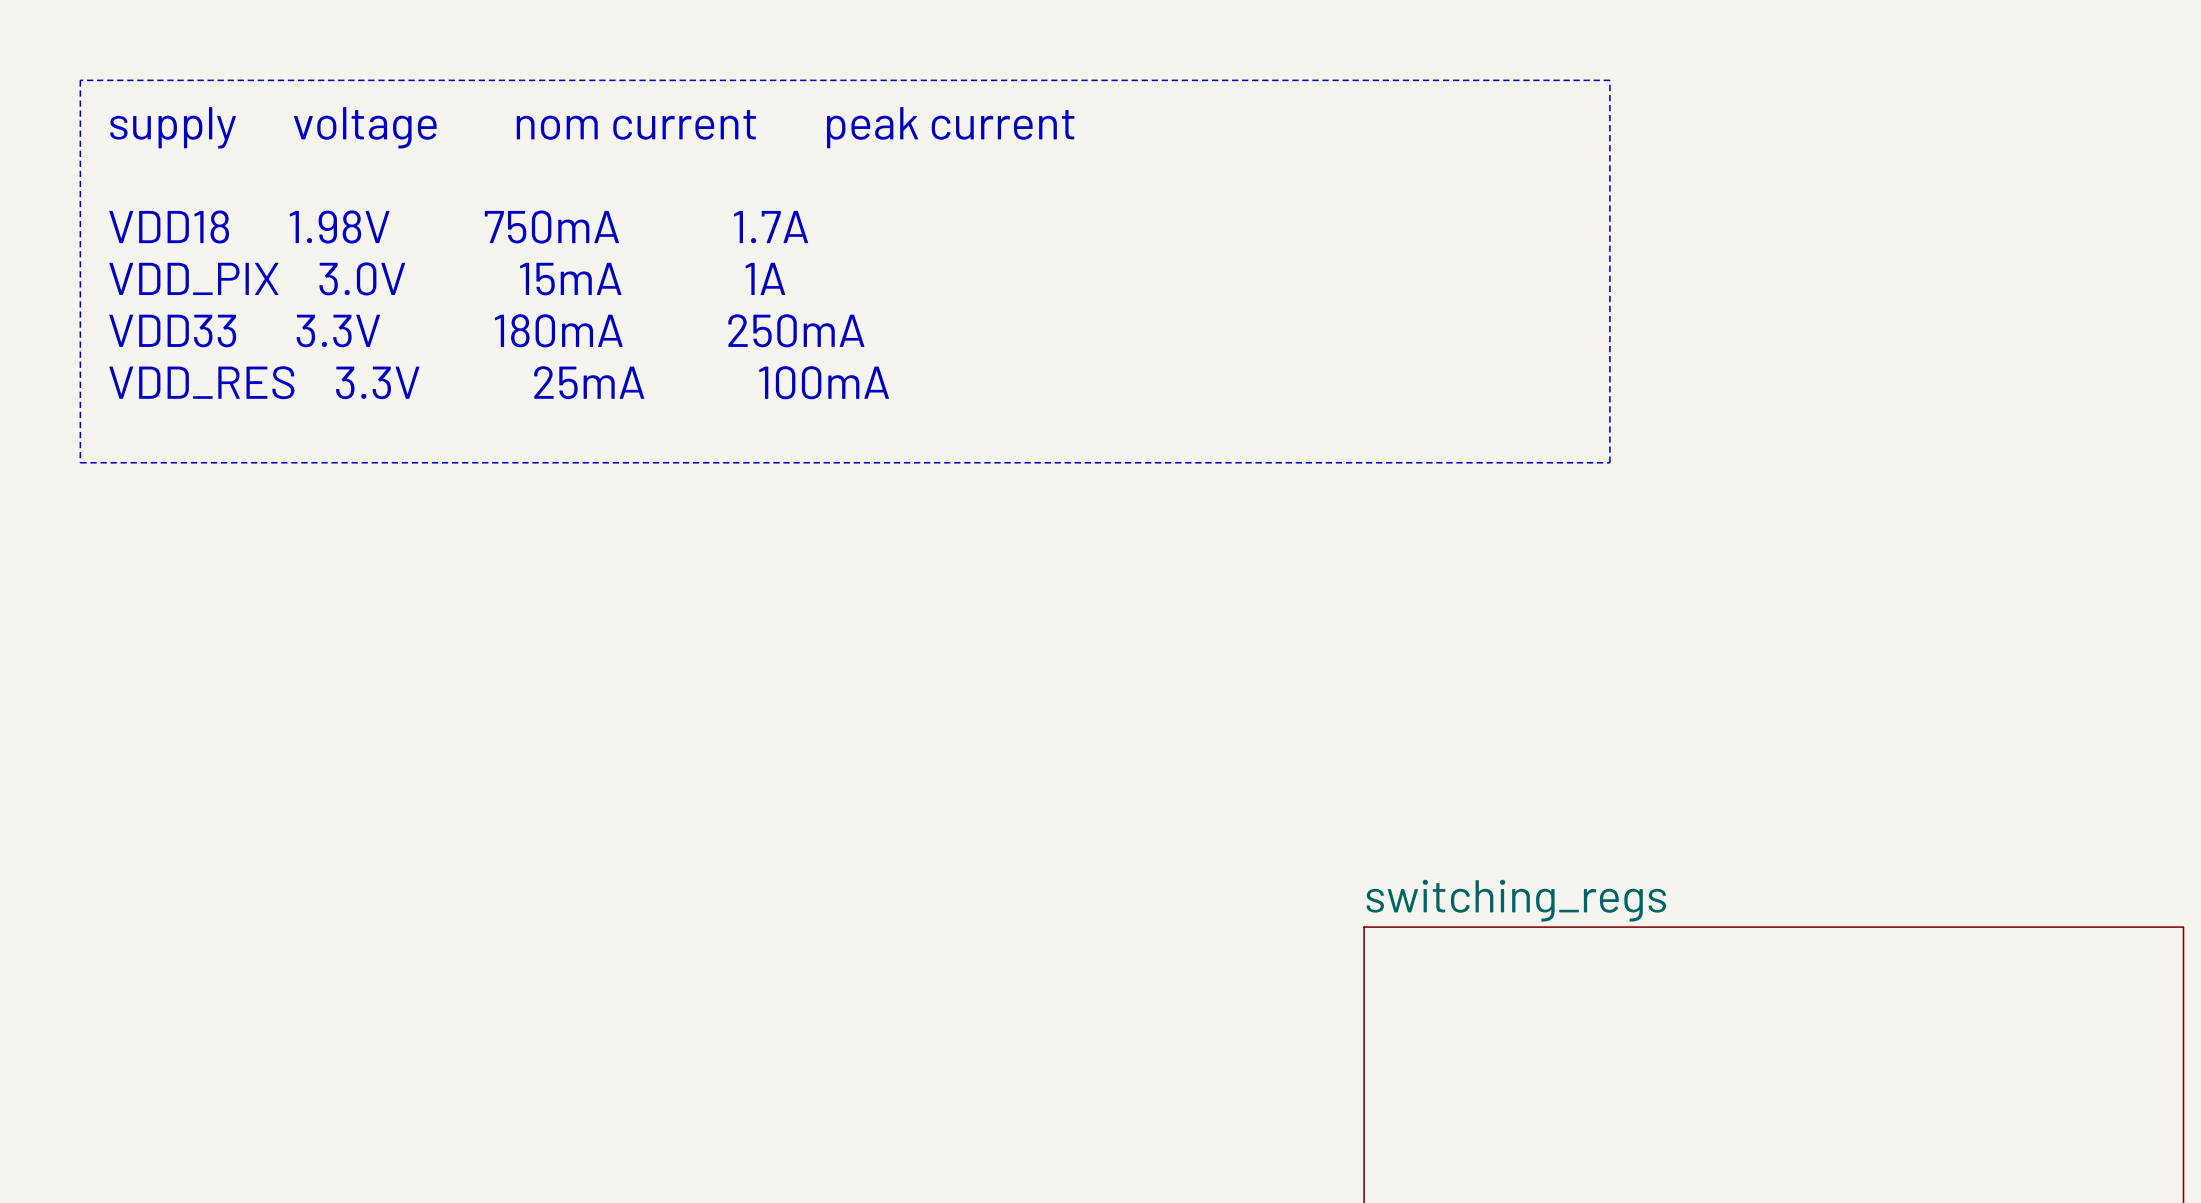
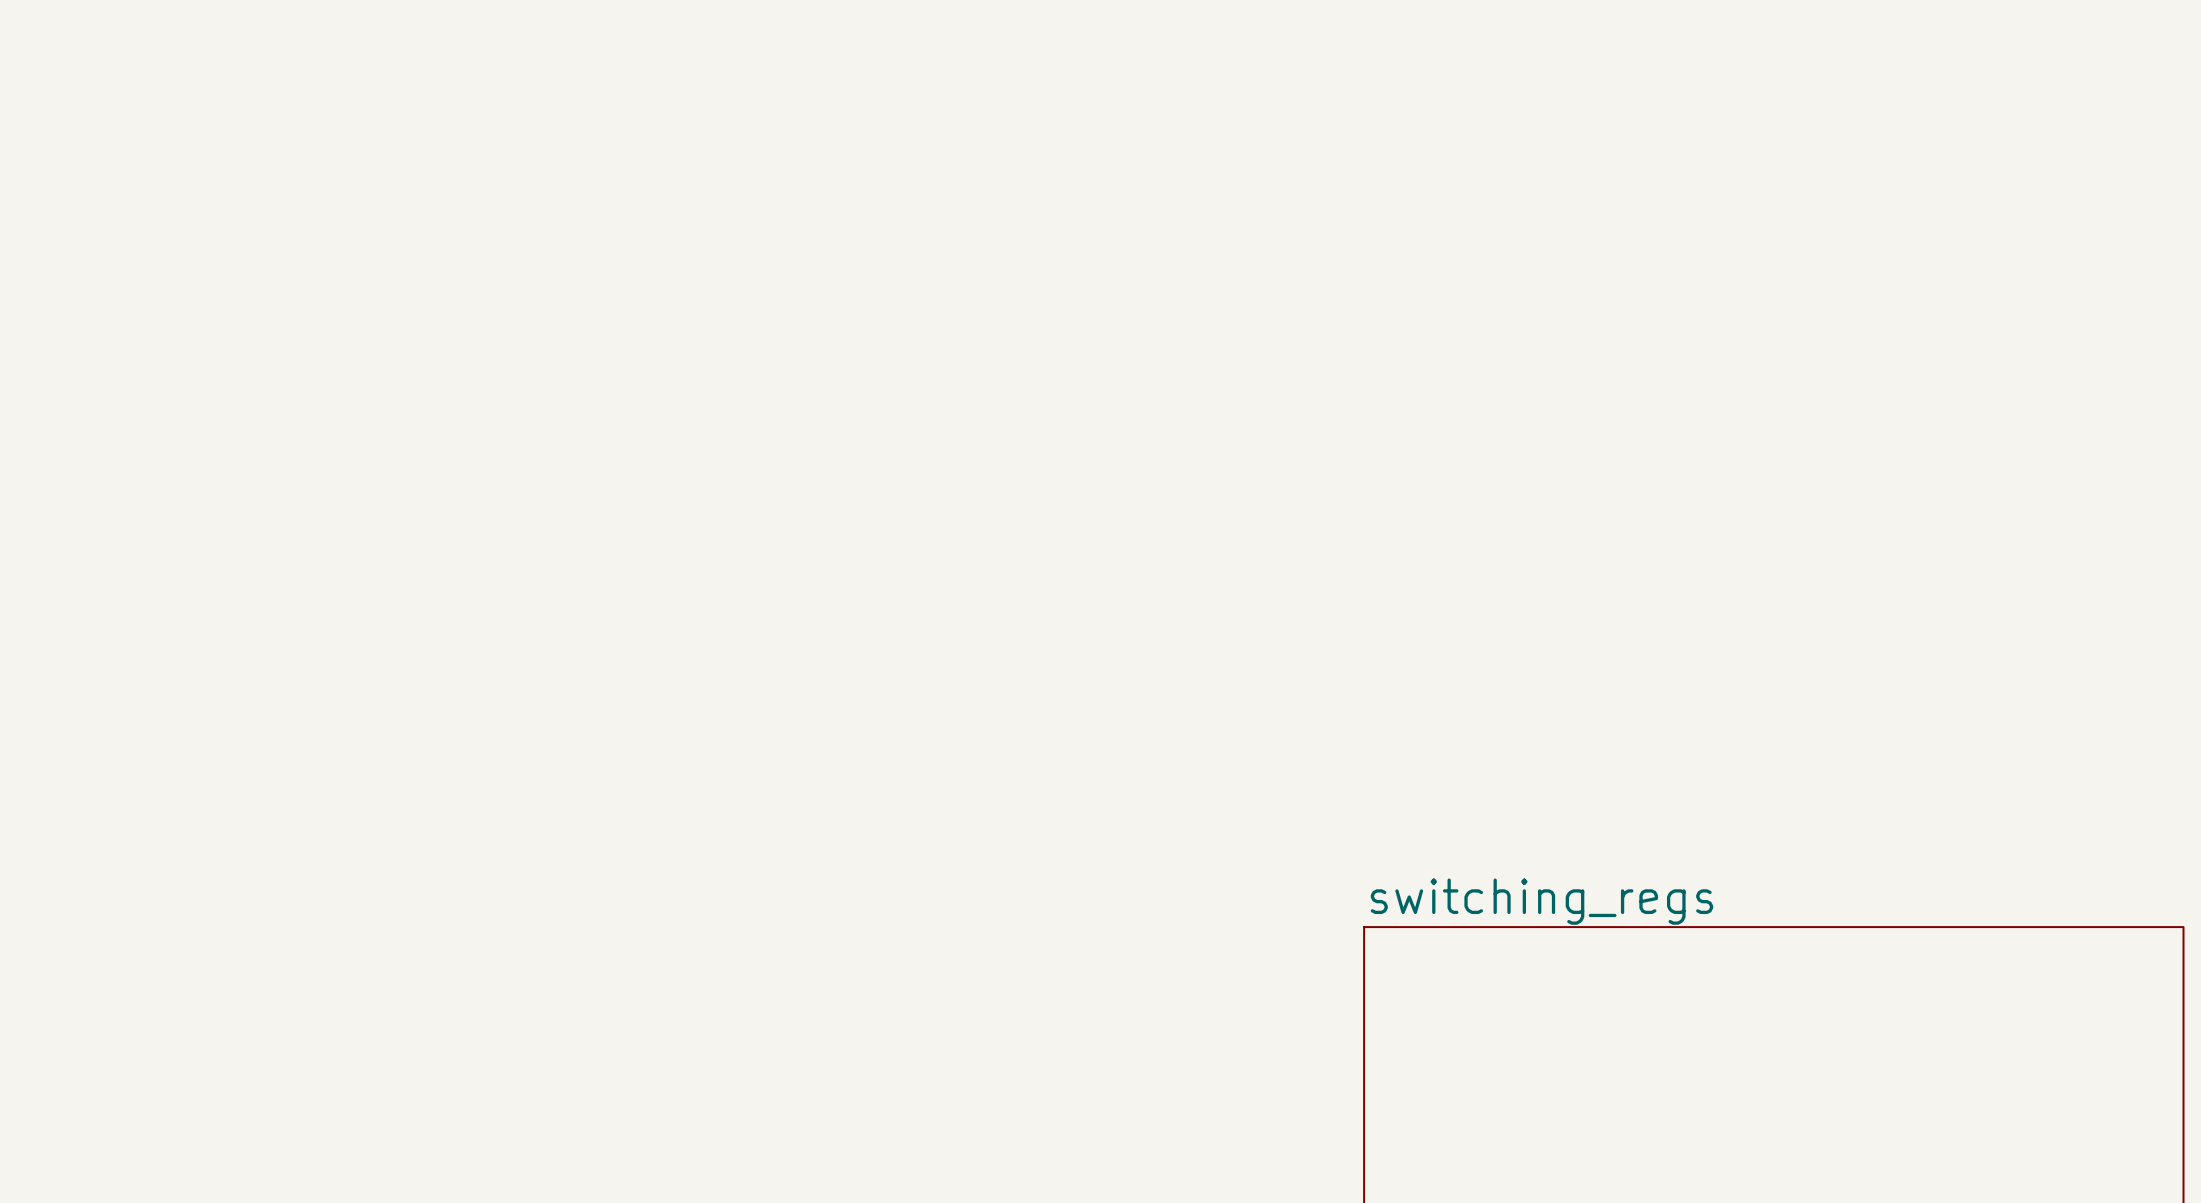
line: (80, 80) (80, 462) (1609, 462) (1609, 80) (80, 80) -> none
text: supply voltage nom current peak current (592, 127) -> none
text: VDD18 1.98V 750mA 1.7A (458, 227) -> none
text: VDD_PIX 3.0V 15mA 1A (447, 278) -> none
text: VDD33 3.3V 180mA 250mA (486, 330) -> none
text: VDD_RES 3.3V 25mA 100mA (499, 382) -> none

